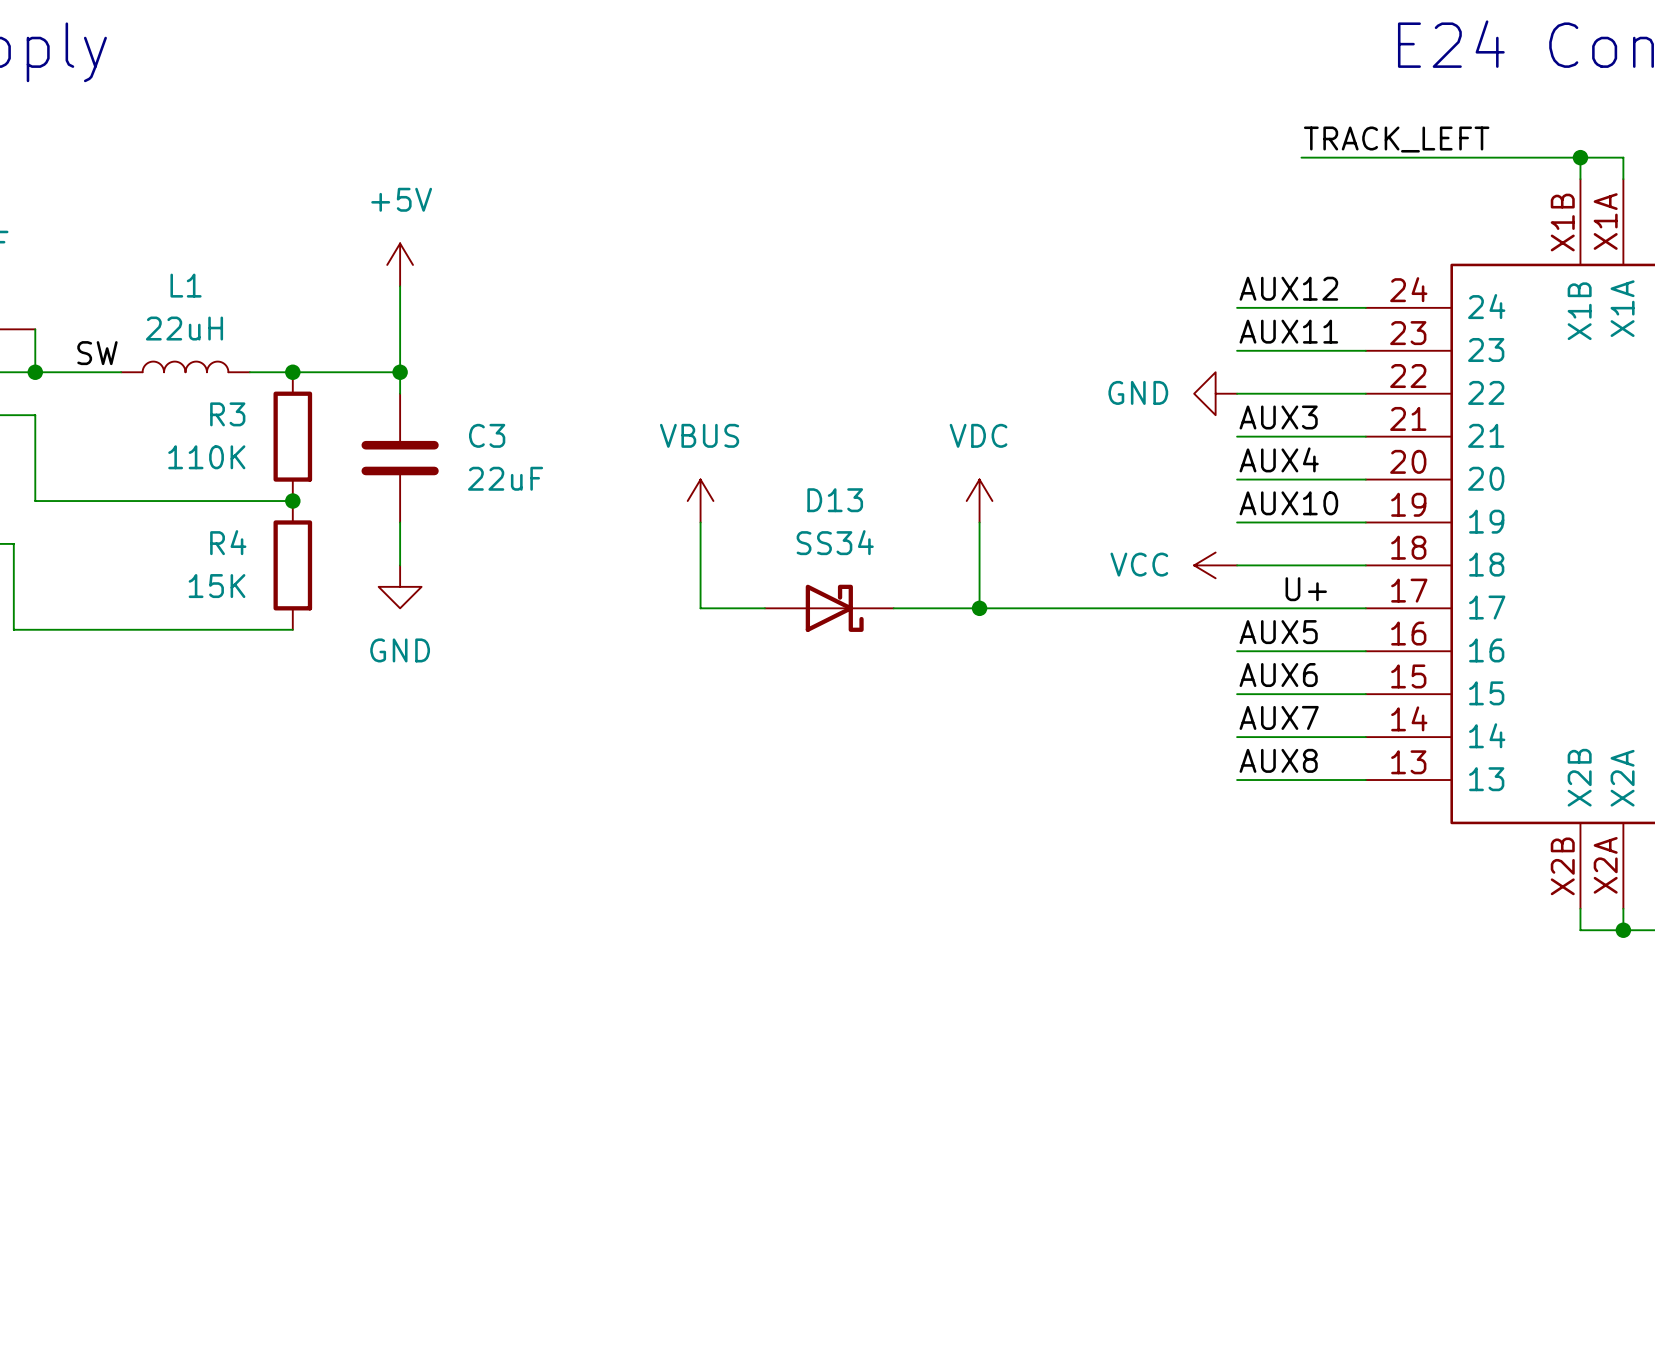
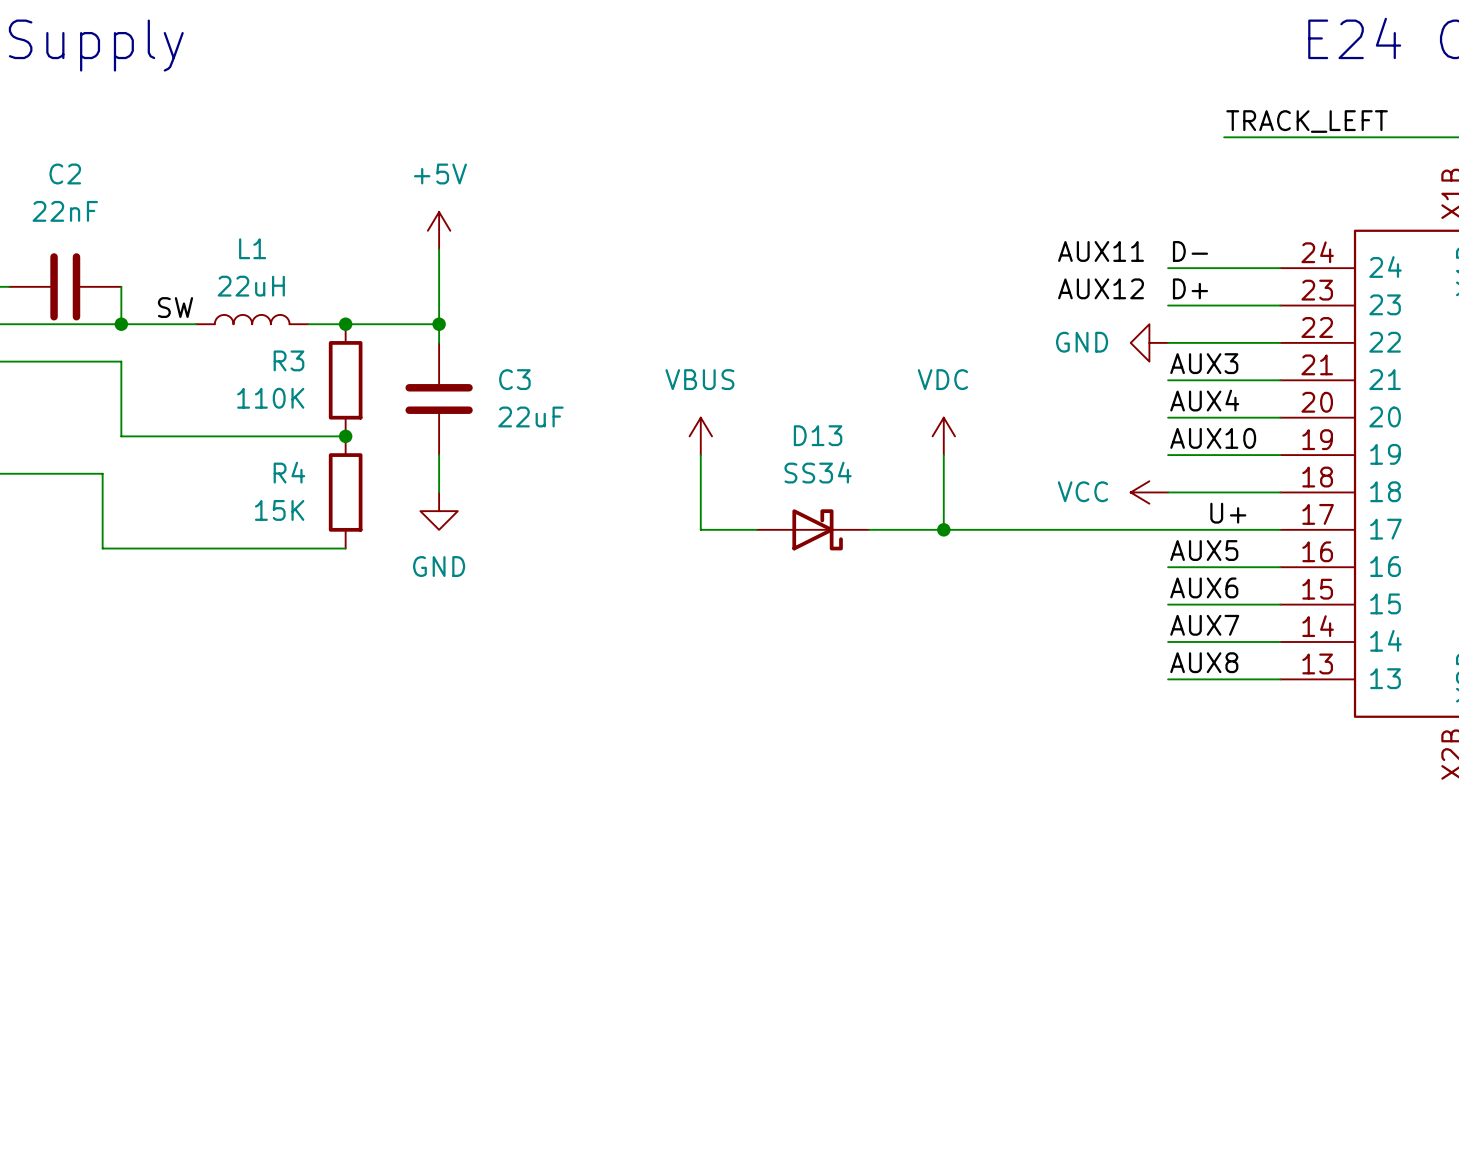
label: none -> AUX11 (1101, 251)
label: AUX12 (1288, 288) -> D- (1190, 251)
label: none -> AUX12 (1101, 288)
label: AUX11 (1288, 331) -> D+ (1190, 288)

